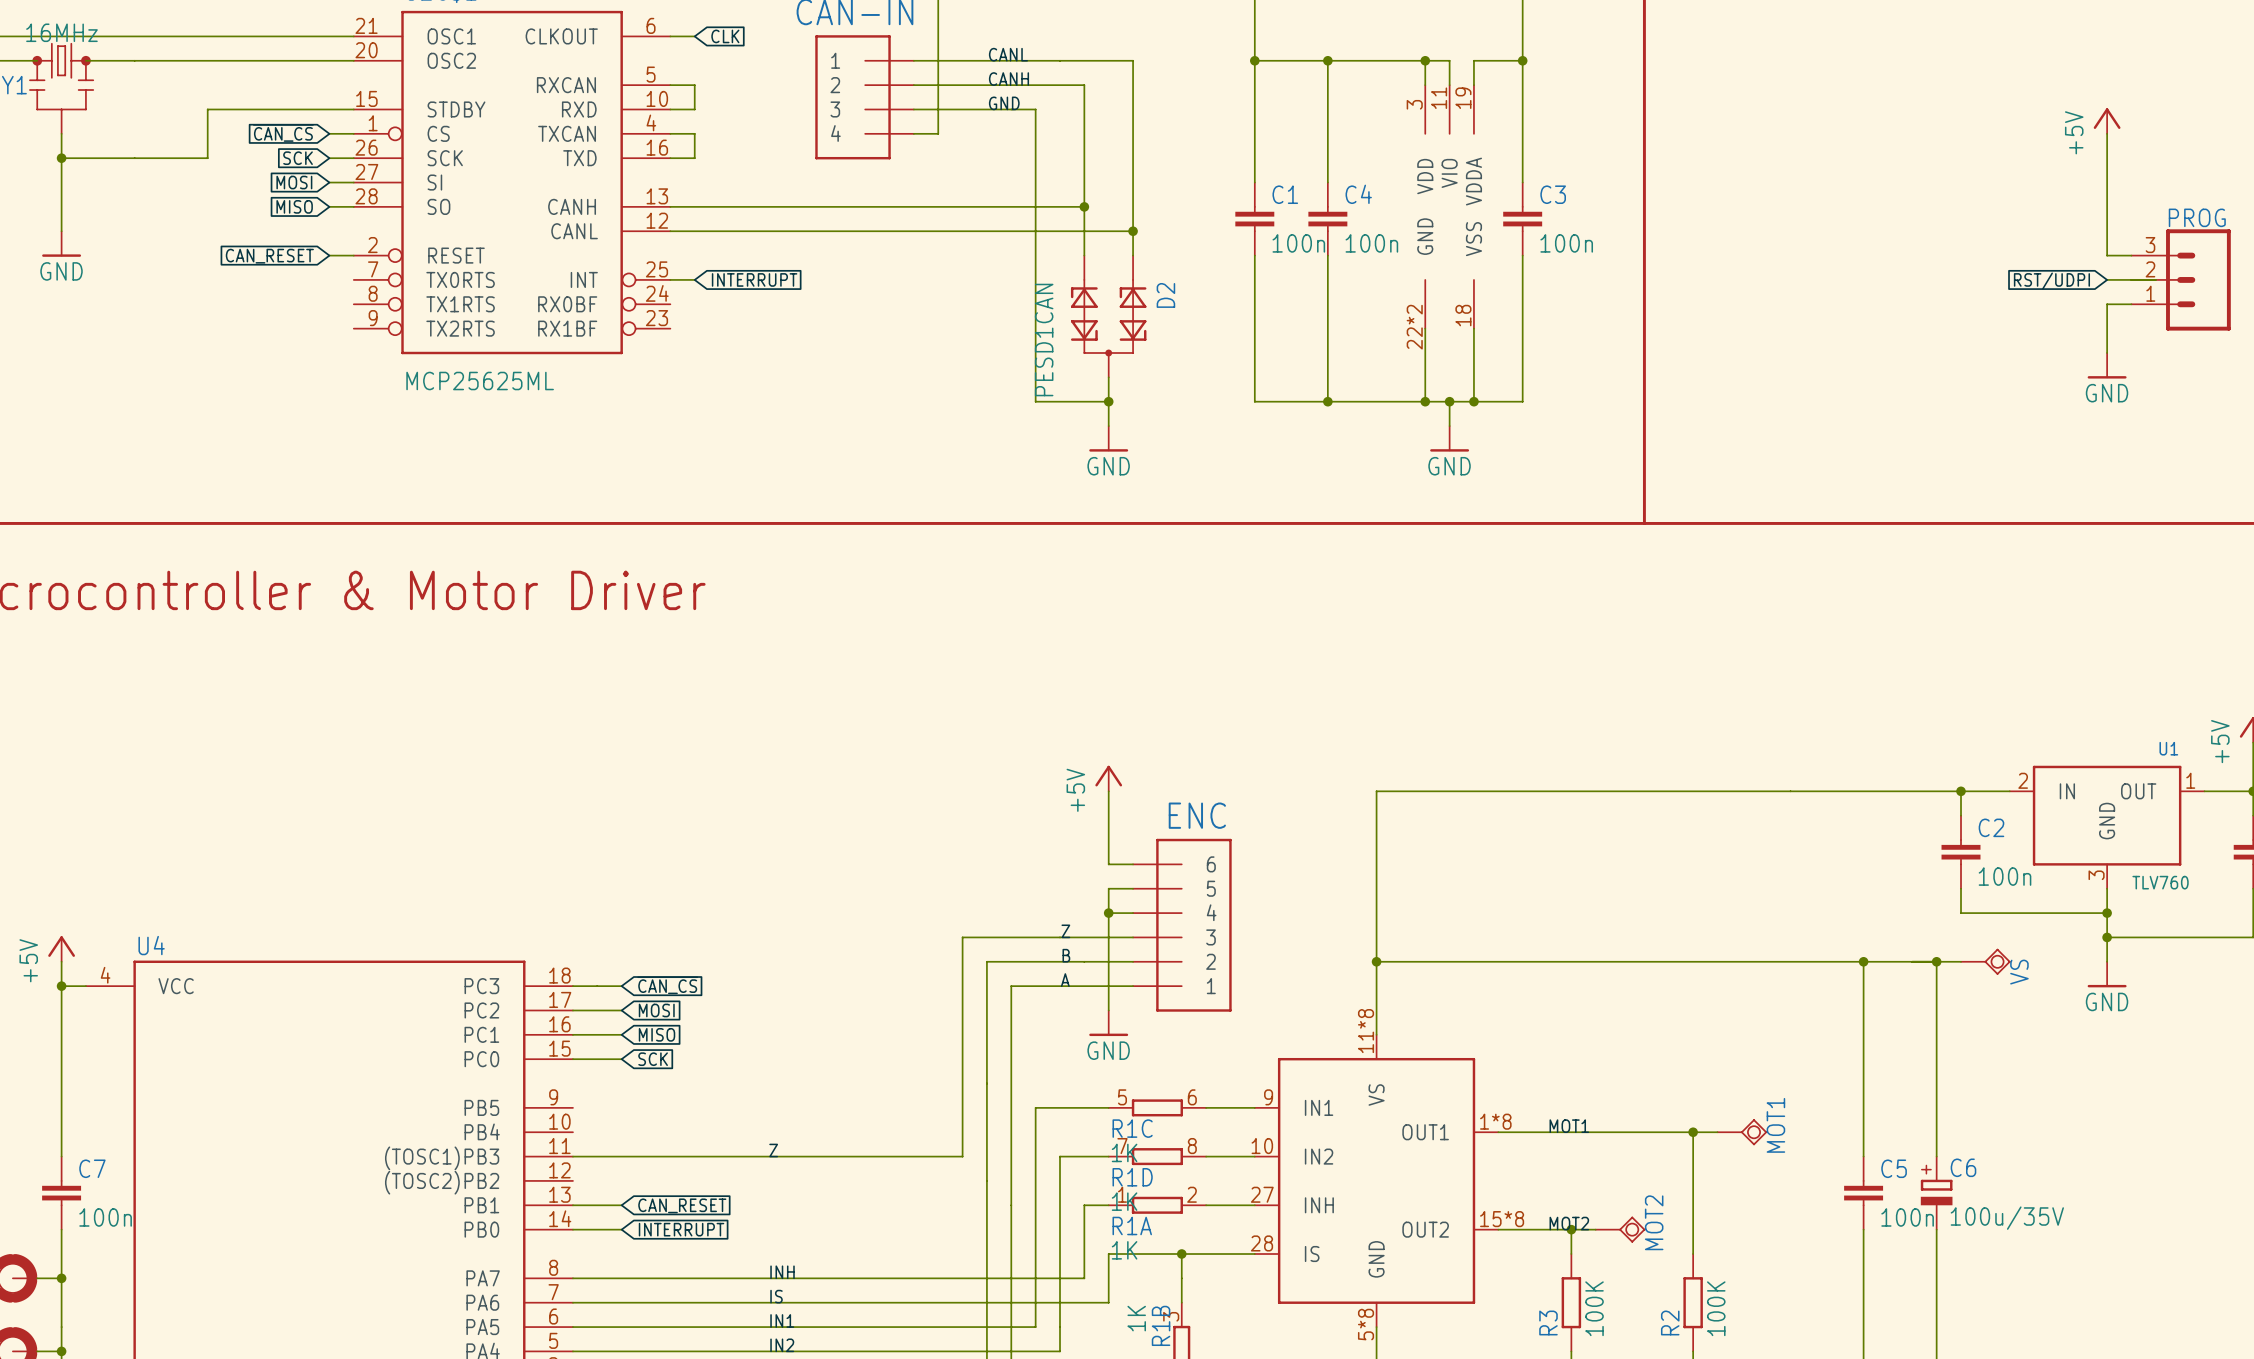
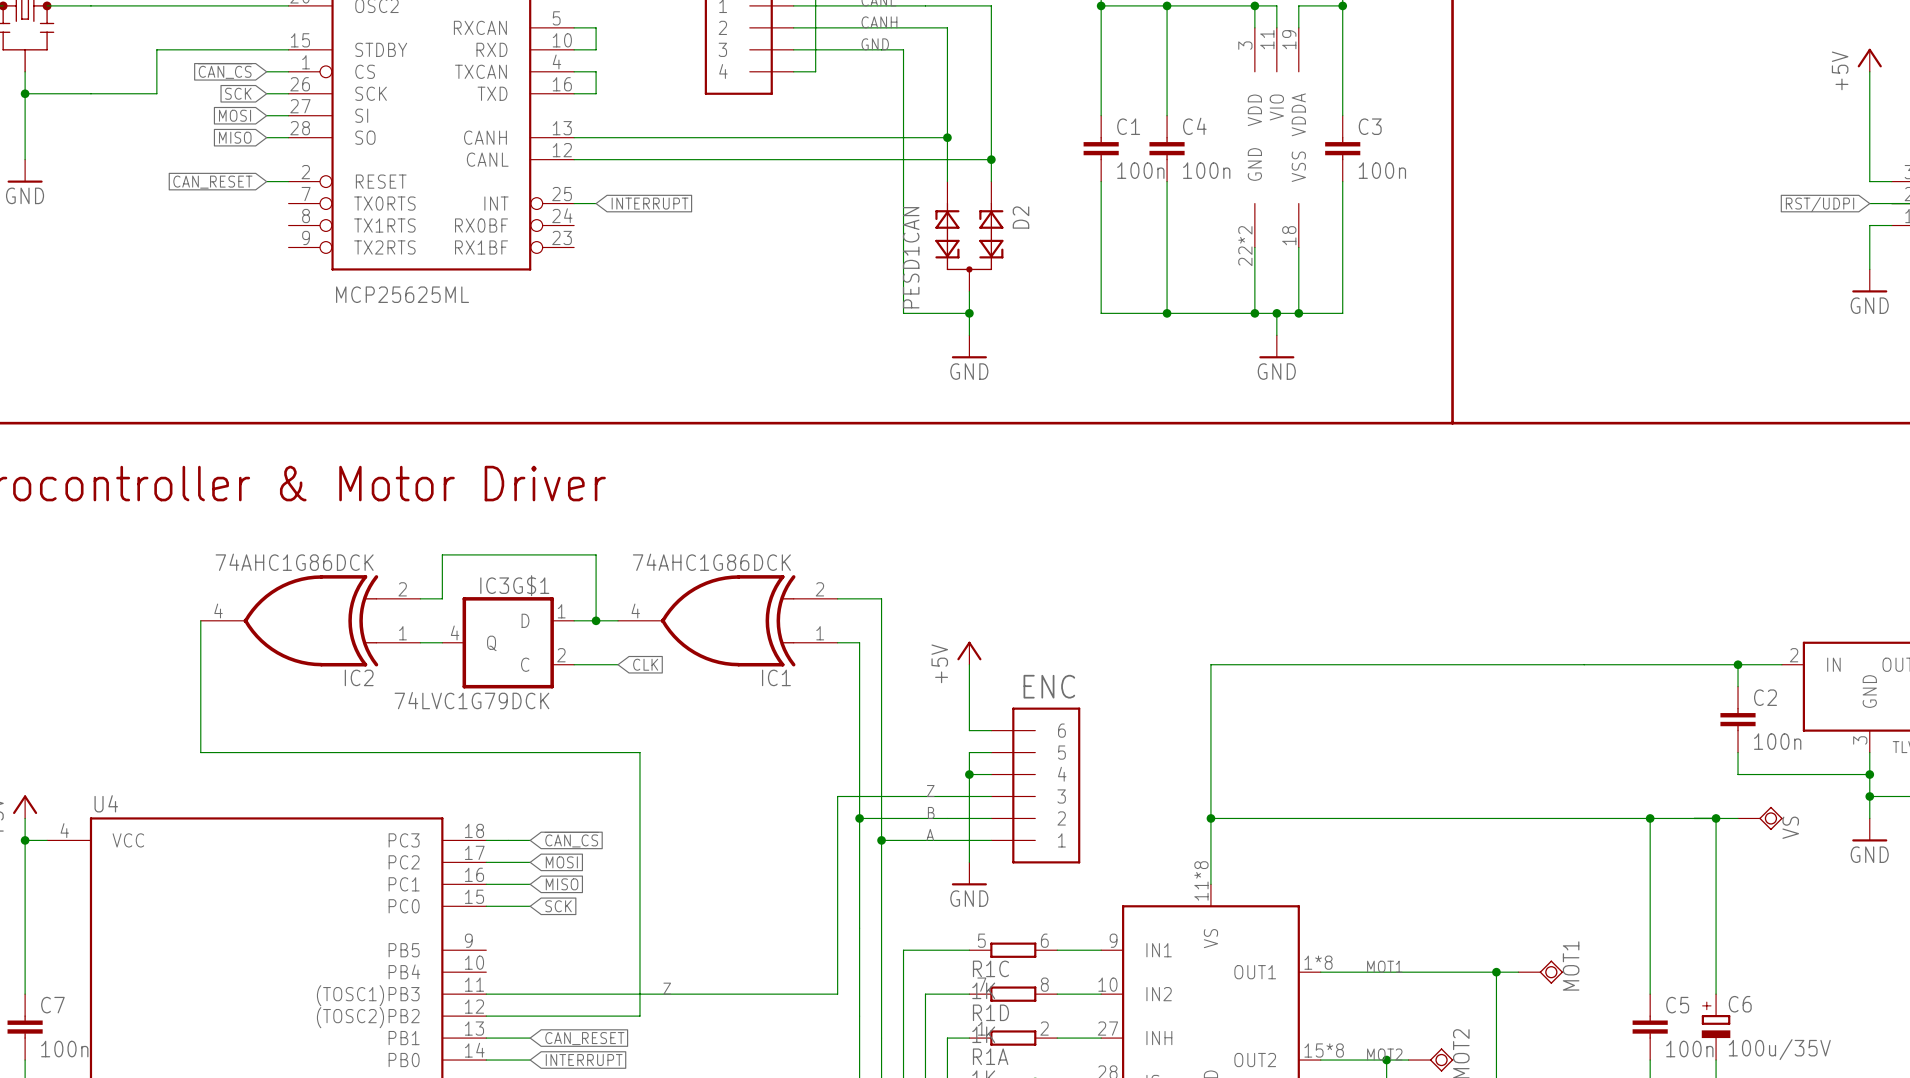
wire: none -> (420, 598) (442, 598) (442, 554) (596, 554) (596, 620)
wire: none -> (837, 598) (881, 598) (881, 840)
wire: none -> (200, 620) (200, 752) (639, 752) (639, 1016) (486, 1016)
IC2: none -> 74AHC1G86DCK (310, 620)
wire: none -> (574, 620) (618, 620)
junction: none -> (596, 620)
IC1: none -> 74AHC1G86DCK (727, 620)
wire: none -> (420, 642) (442, 642)
IC3G$1: none -> 74LVC1G79DCK (508, 642)
wire: none -> (837, 642) (859, 642) (859, 818)
wire: none -> (574, 664) (618, 664)
global label: none -> CLK (645, 664)
junction: none -> (859, 818)
junction: none -> (881, 840)

